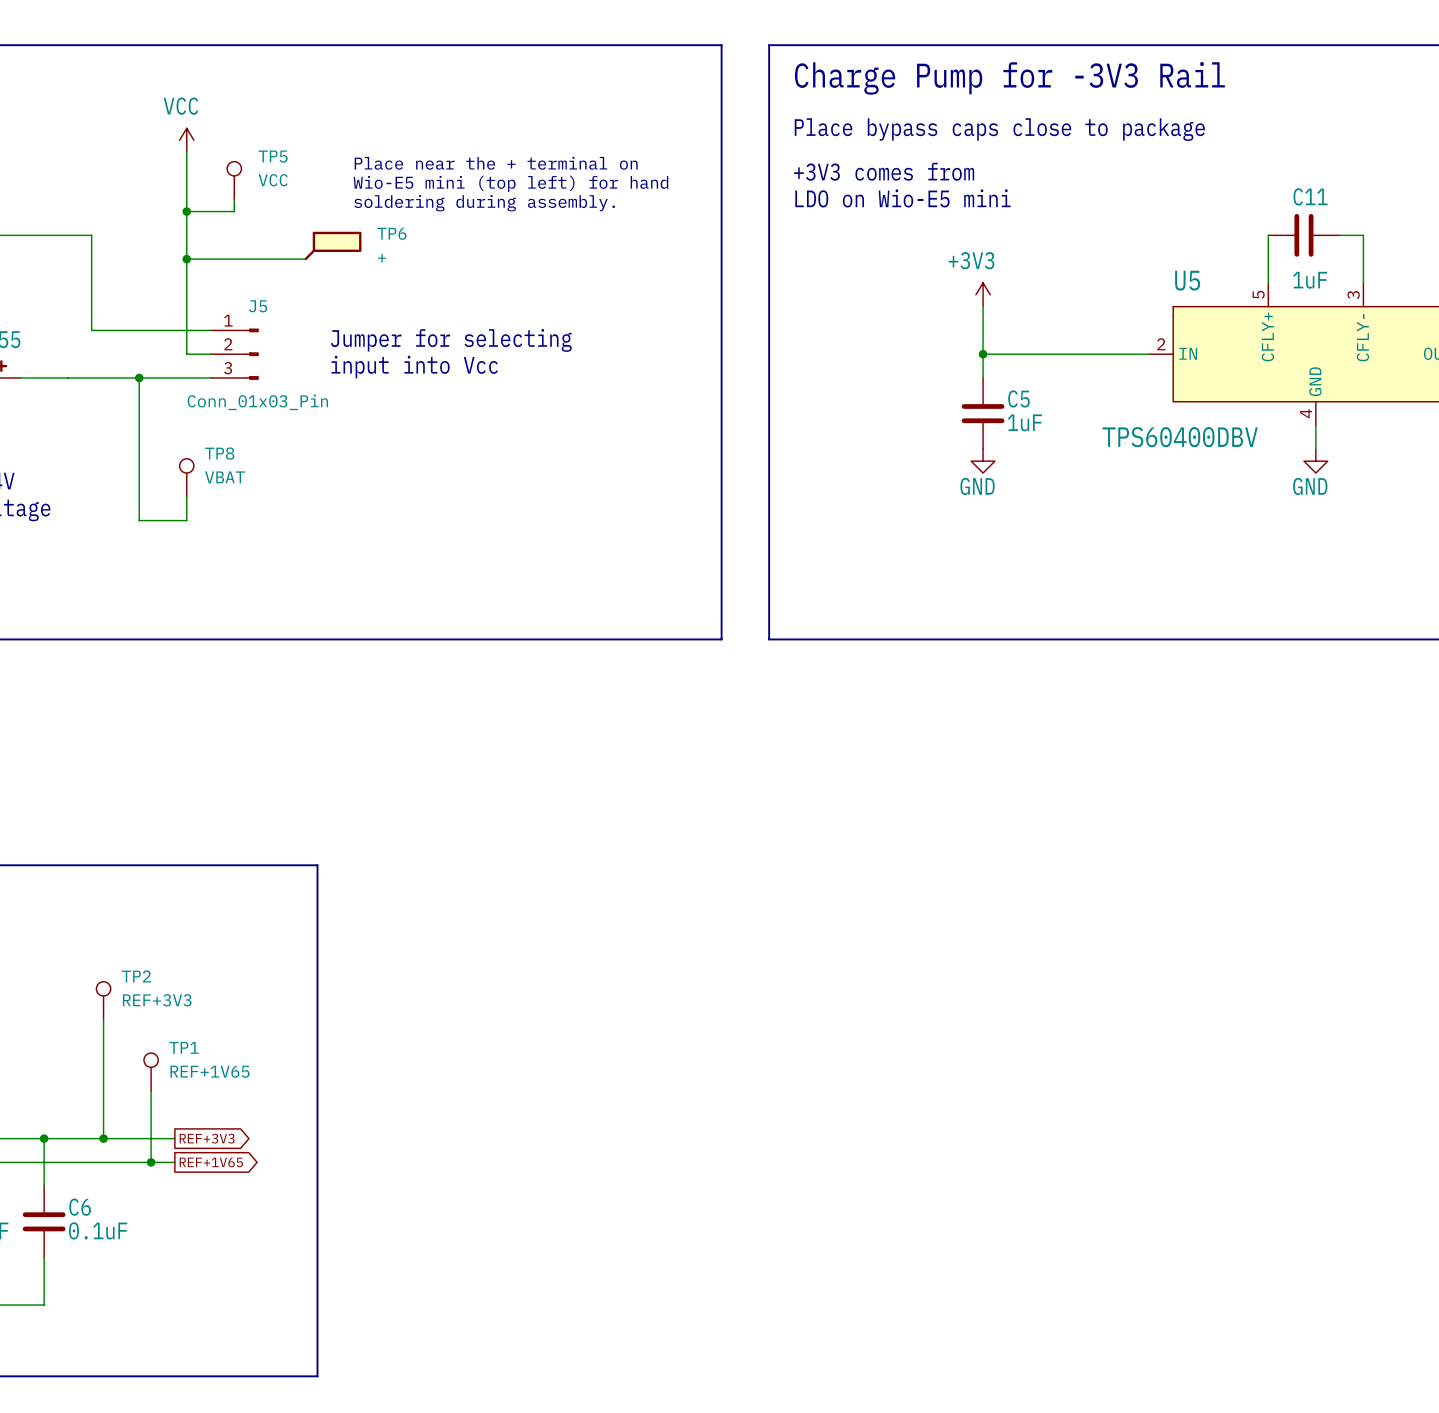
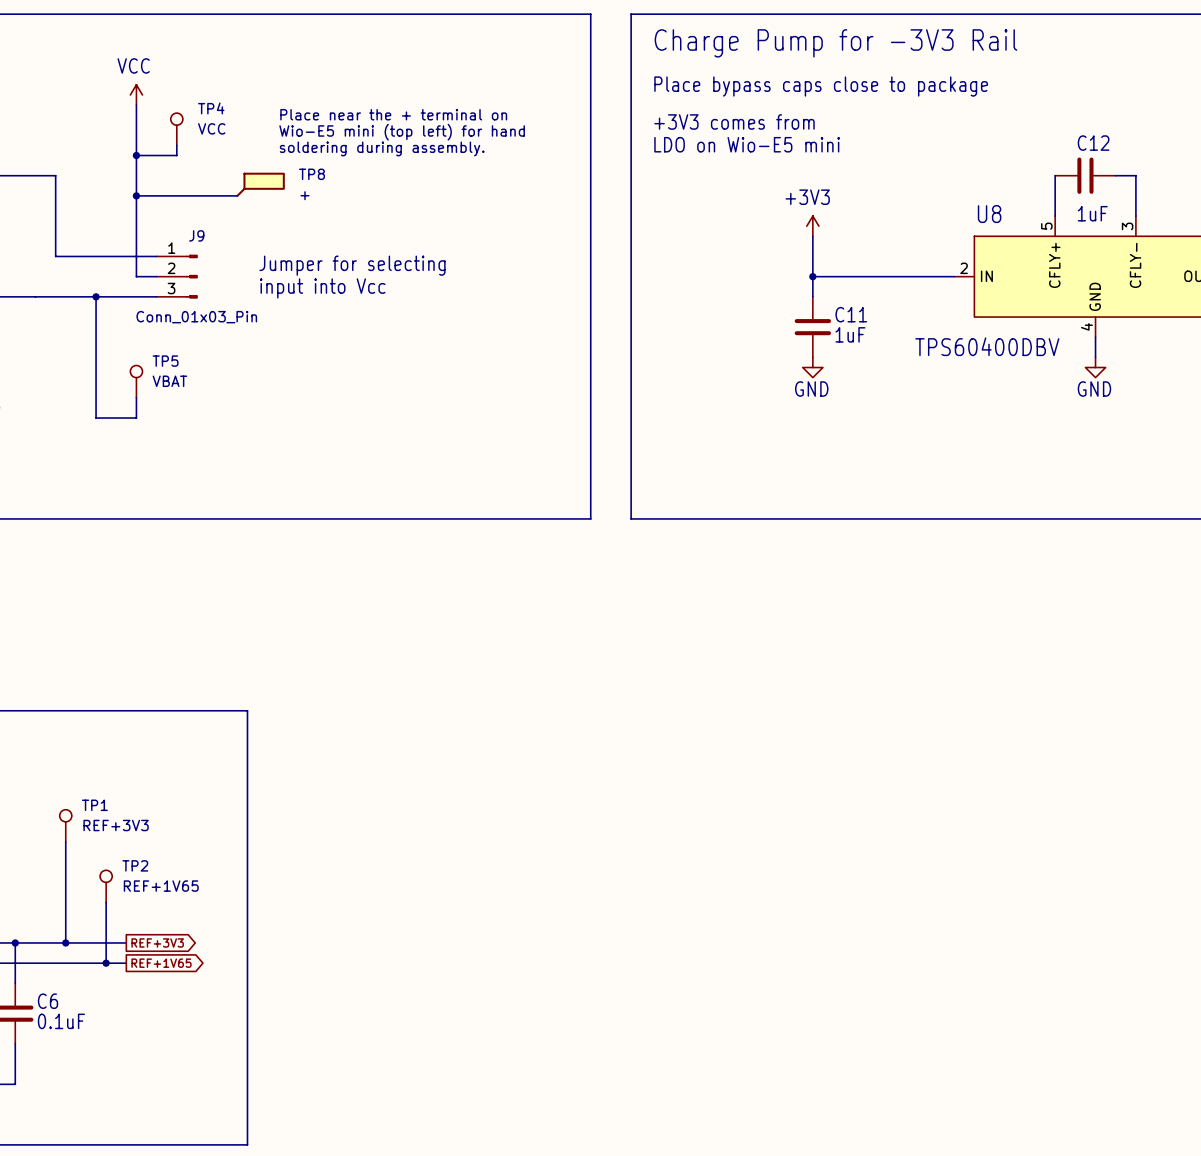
TP5 name: TP5 (273, 156) -> TP4 (211, 108)
C11 name: C11 (1310, 196) -> C12 (1093, 143)
TP6 name: TP6 (391, 233) -> TP8 (311, 174)
U5 name: U5 (1187, 280) -> U8 (989, 214)
J5 name: J5 (258, 306) -> J9 (196, 235)
C5 name: C5 (1019, 398) -> C11 (851, 314)
TP8 name: TP8 (219, 453) -> TP5 (165, 361)
TP2 name: TP2 (136, 976) -> TP1 (94, 805)
TP1 name: TP1 (184, 1047) -> TP2 (135, 865)

